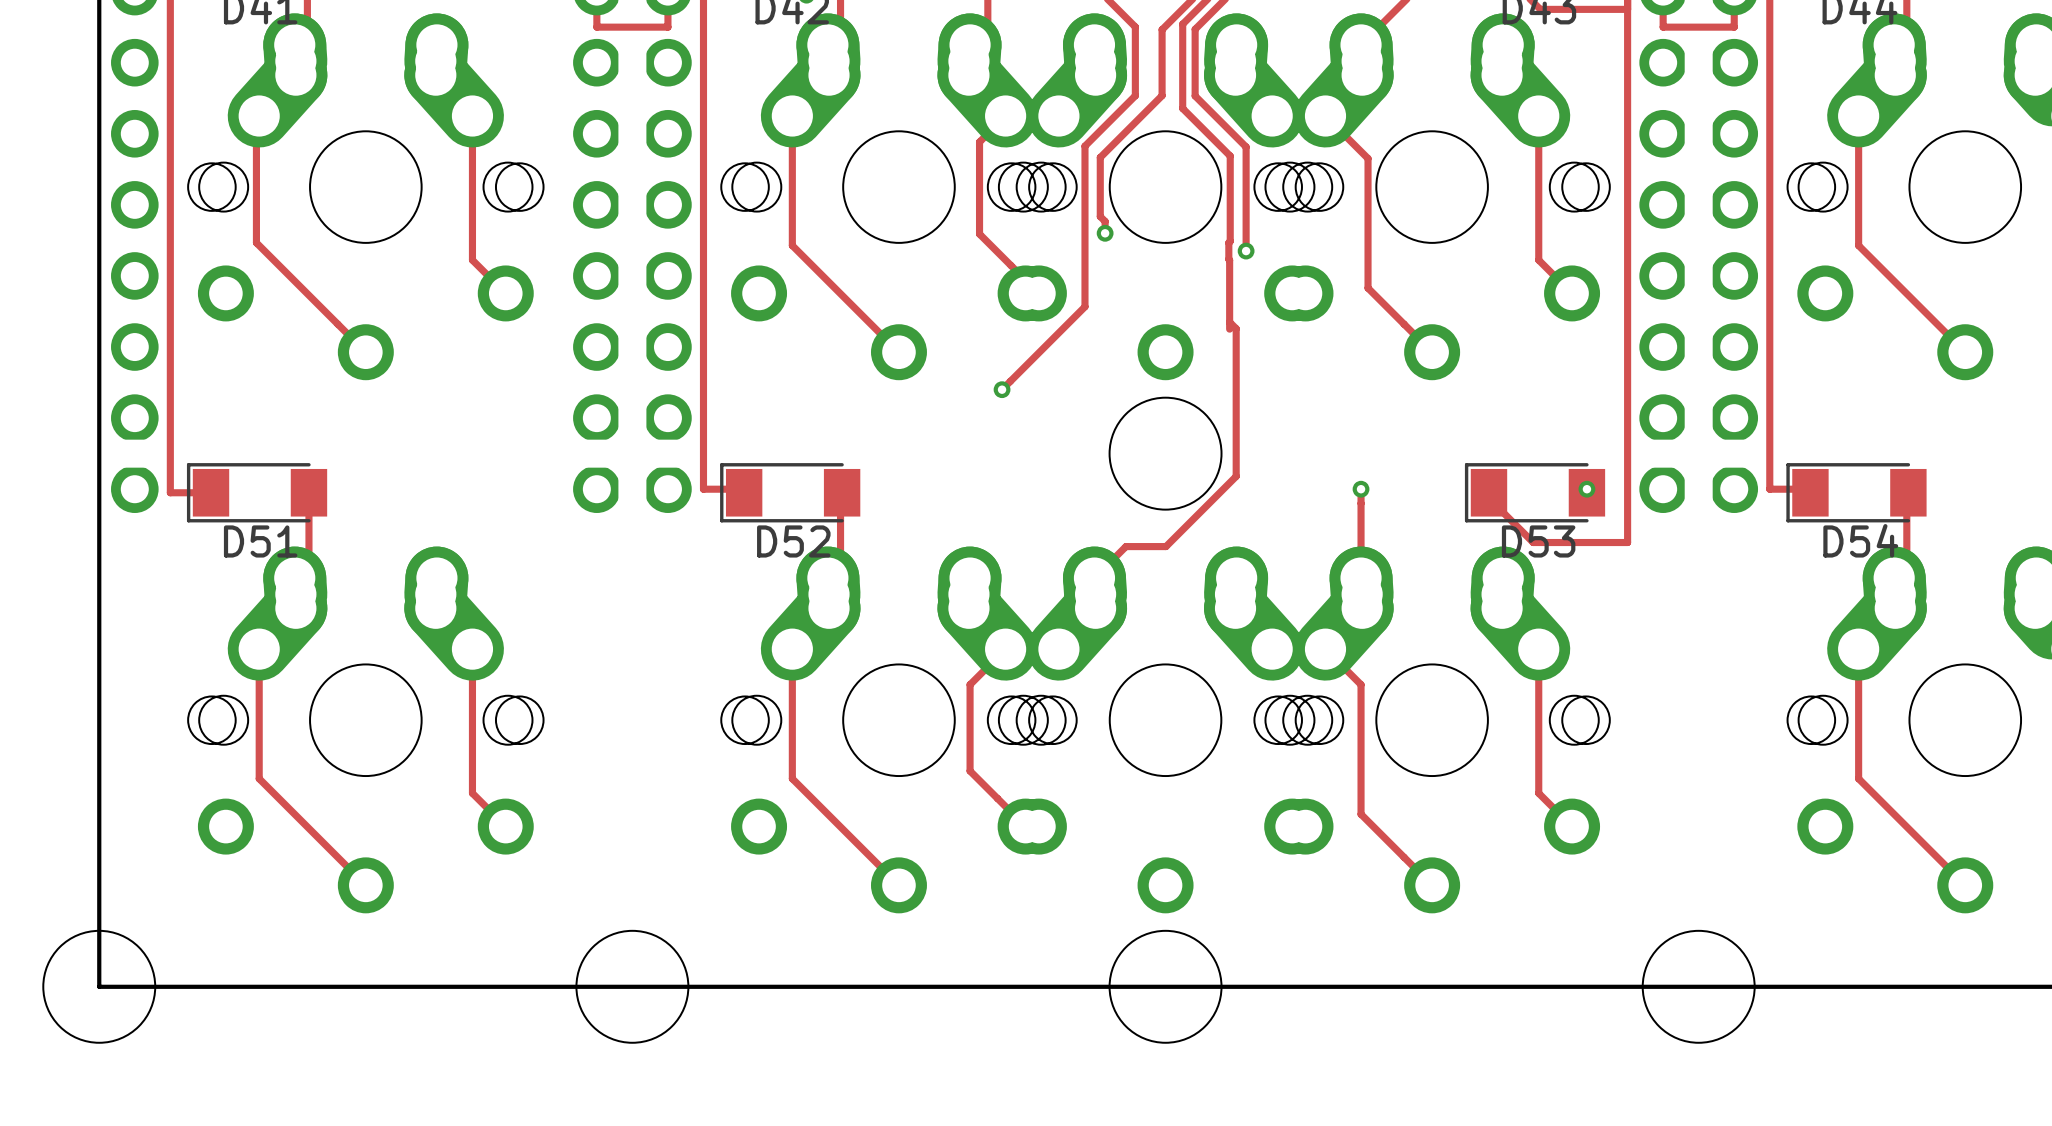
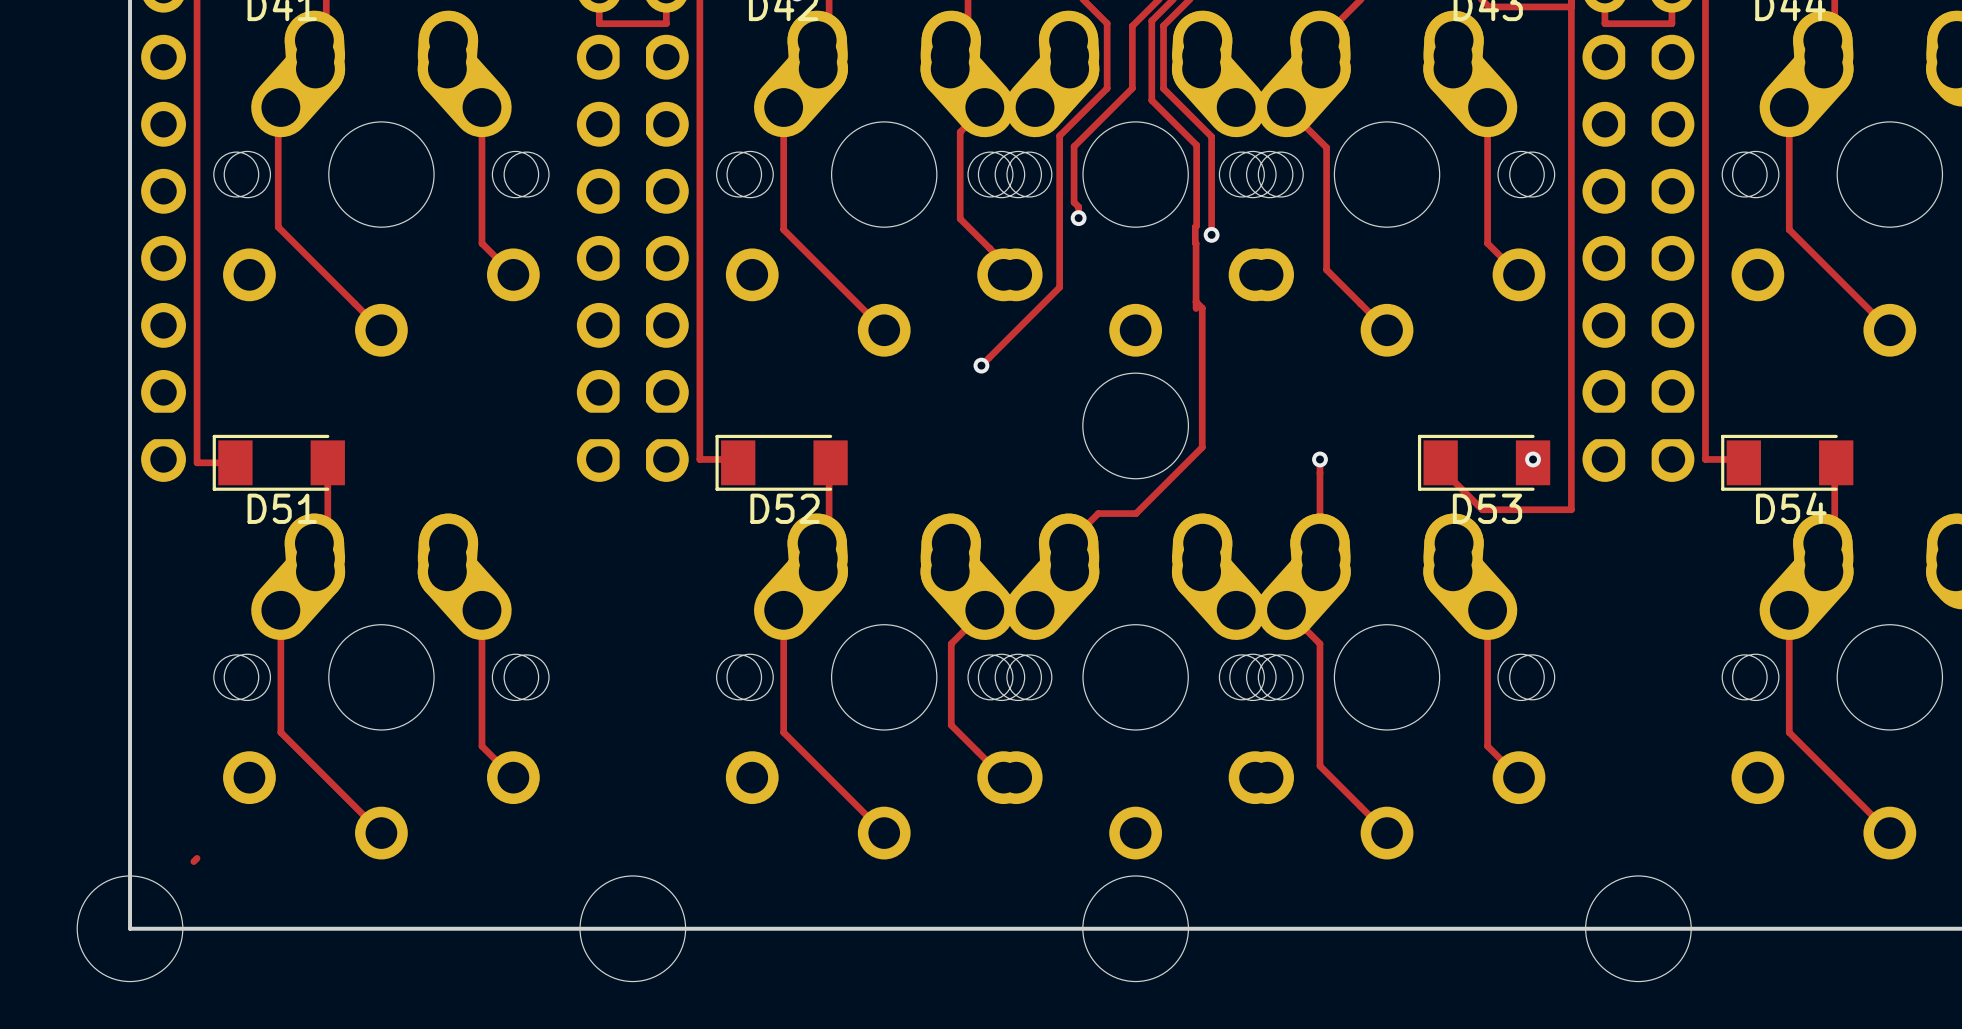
track: none -> (197, 858) (193, 861)

